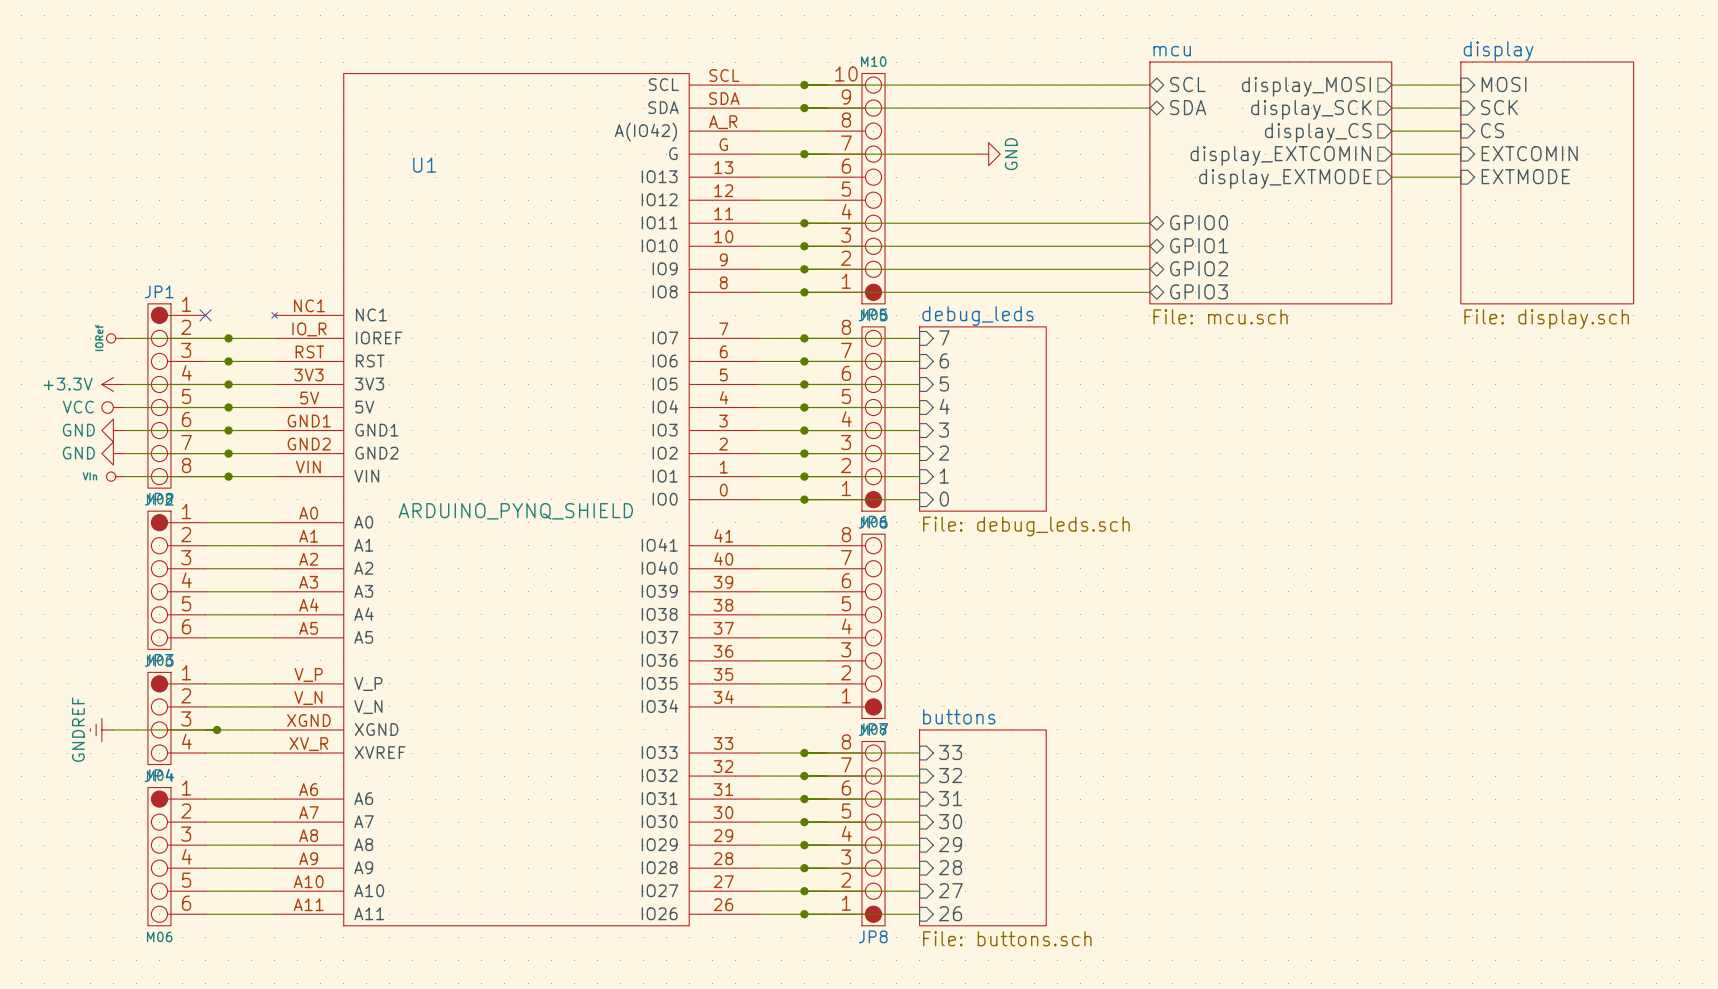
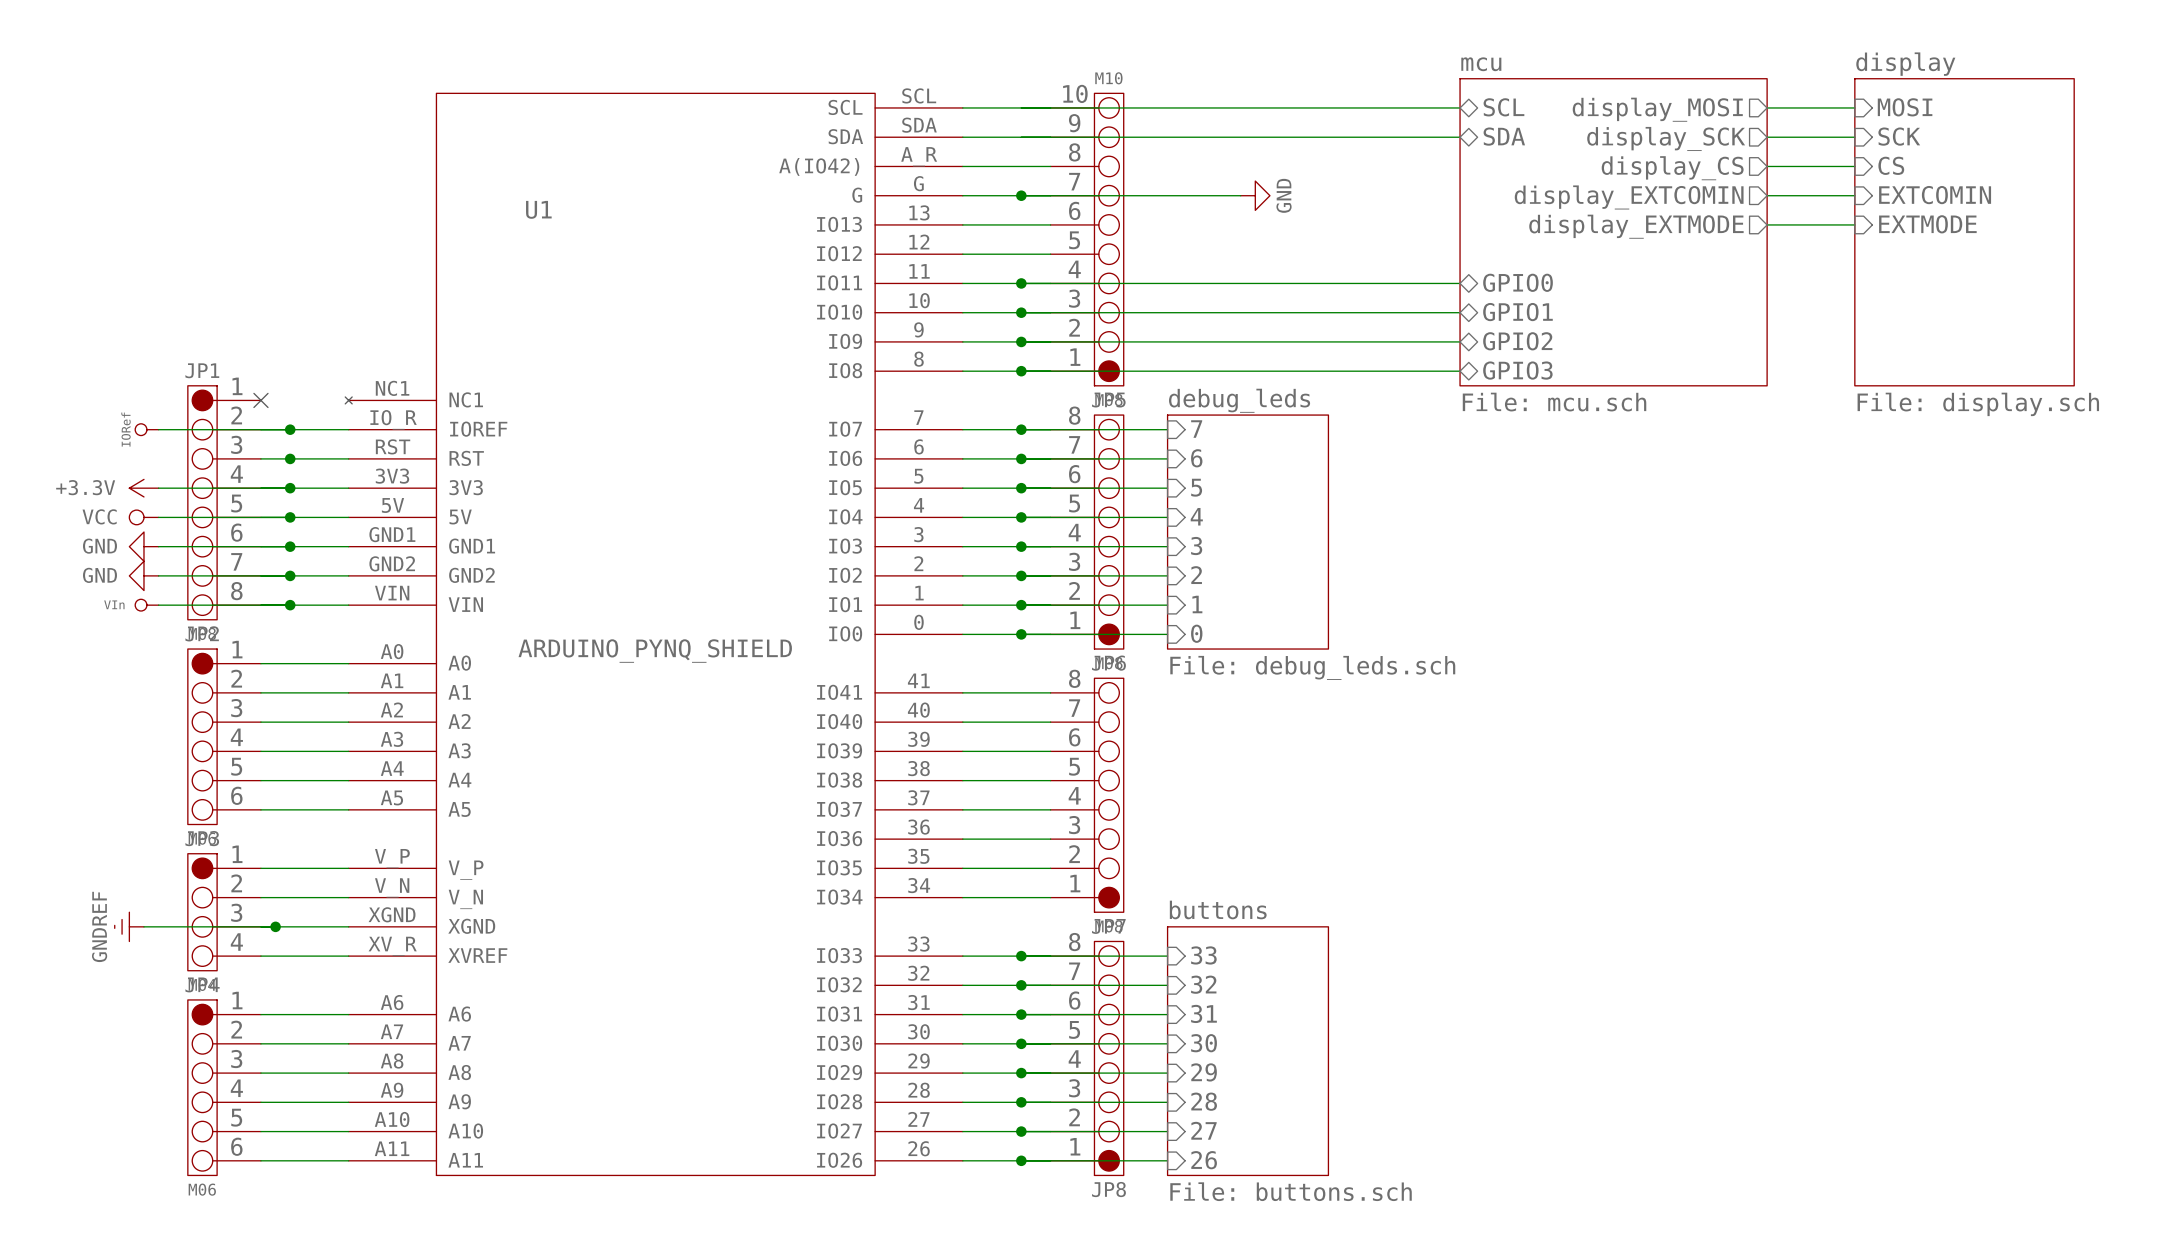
junction: (804, 85) -> none
junction: (804, 108) -> none

